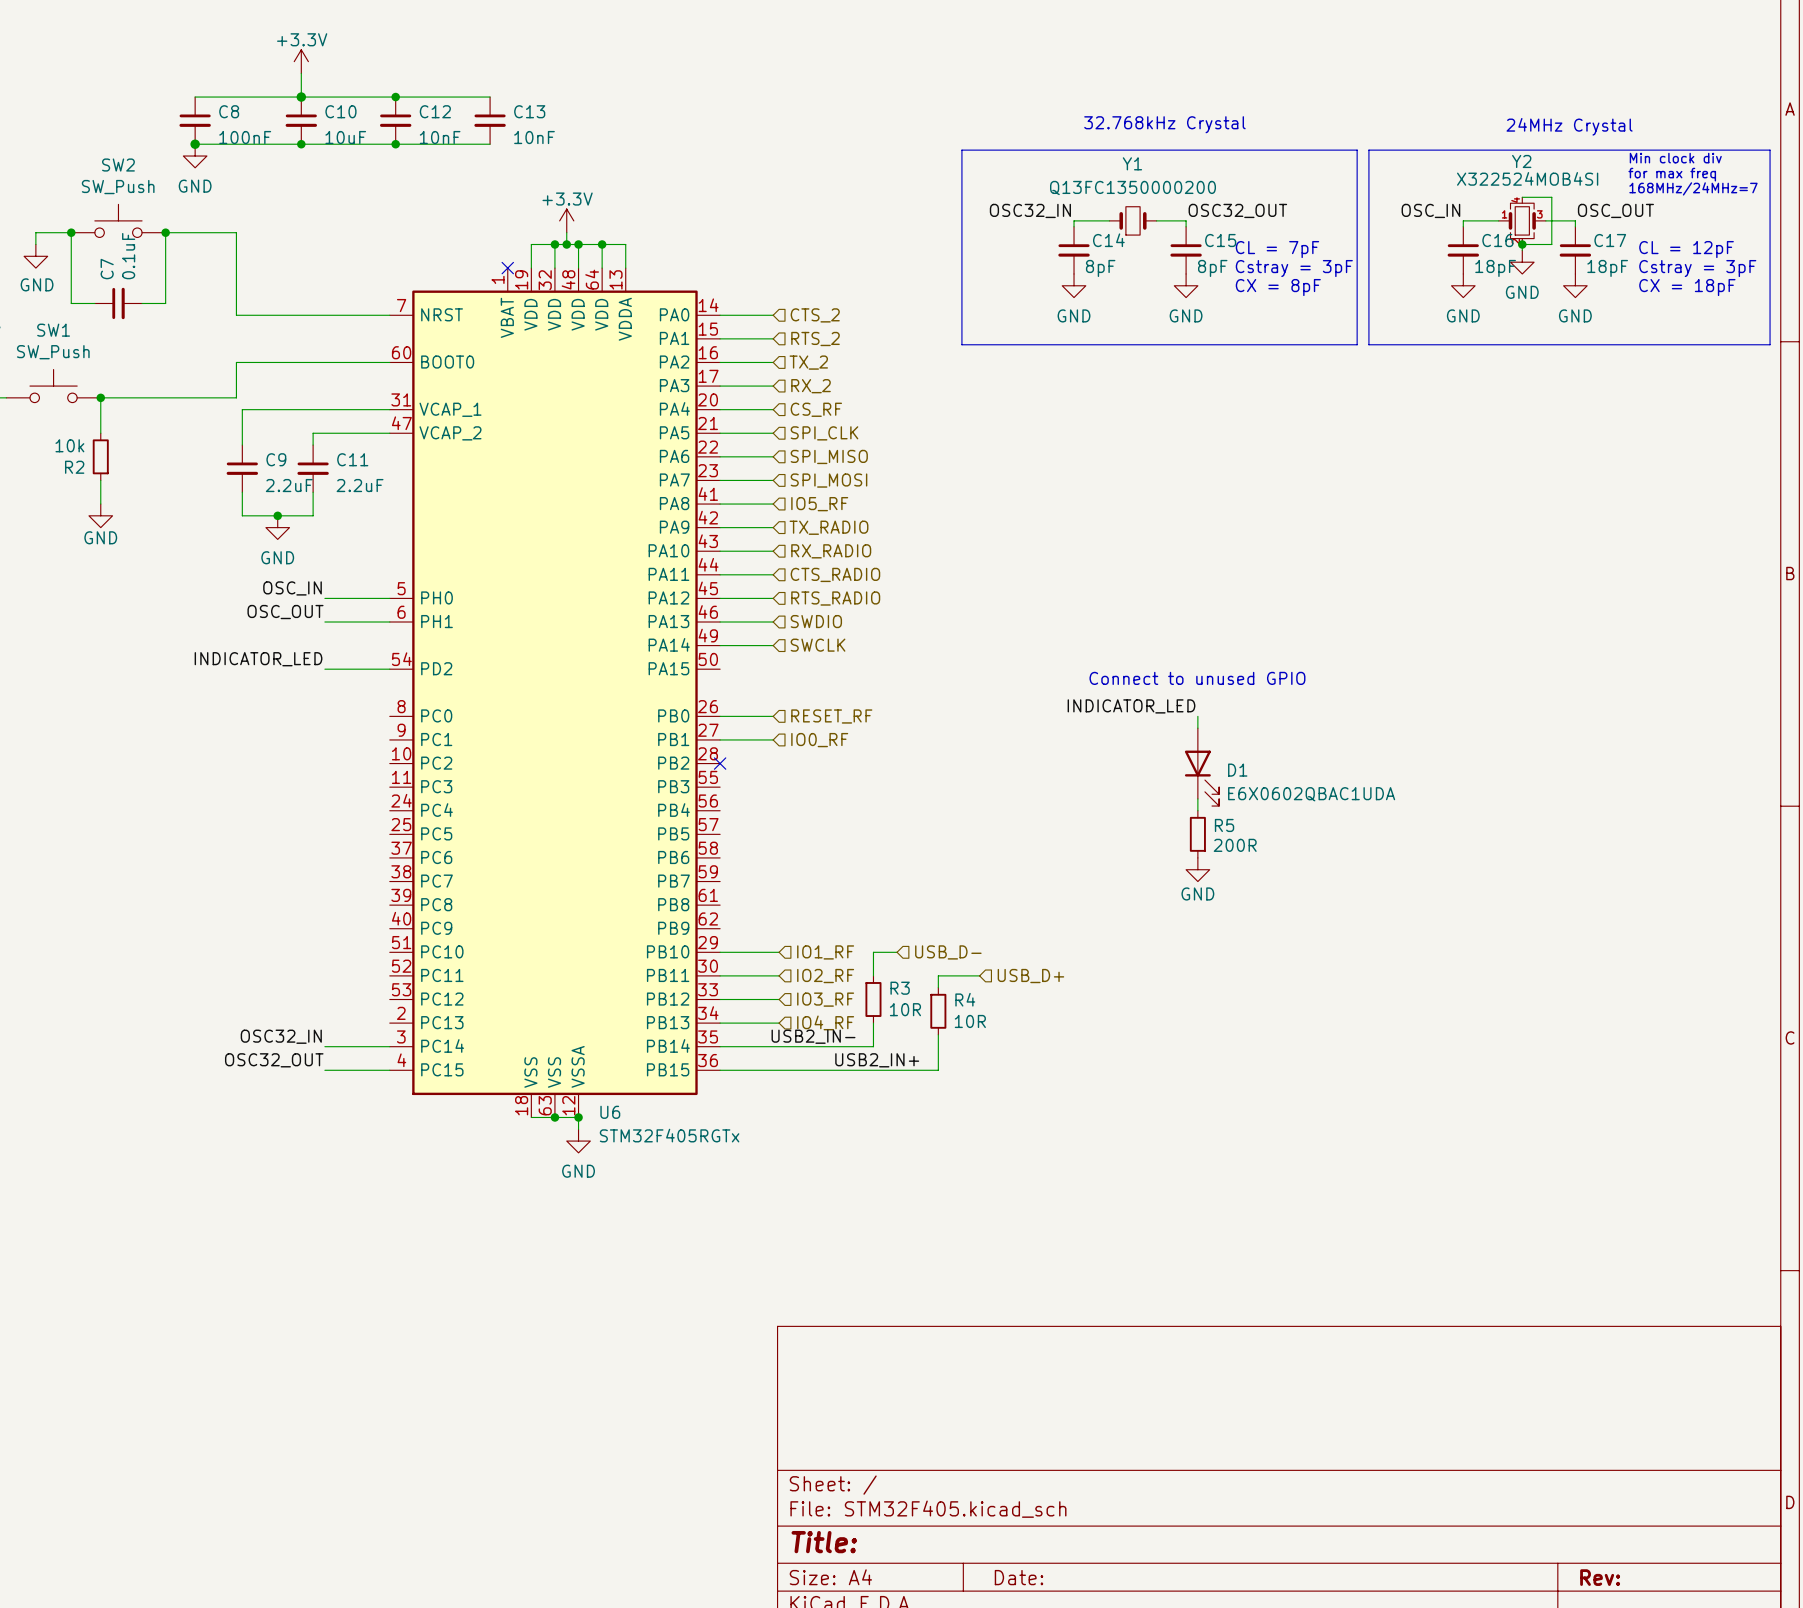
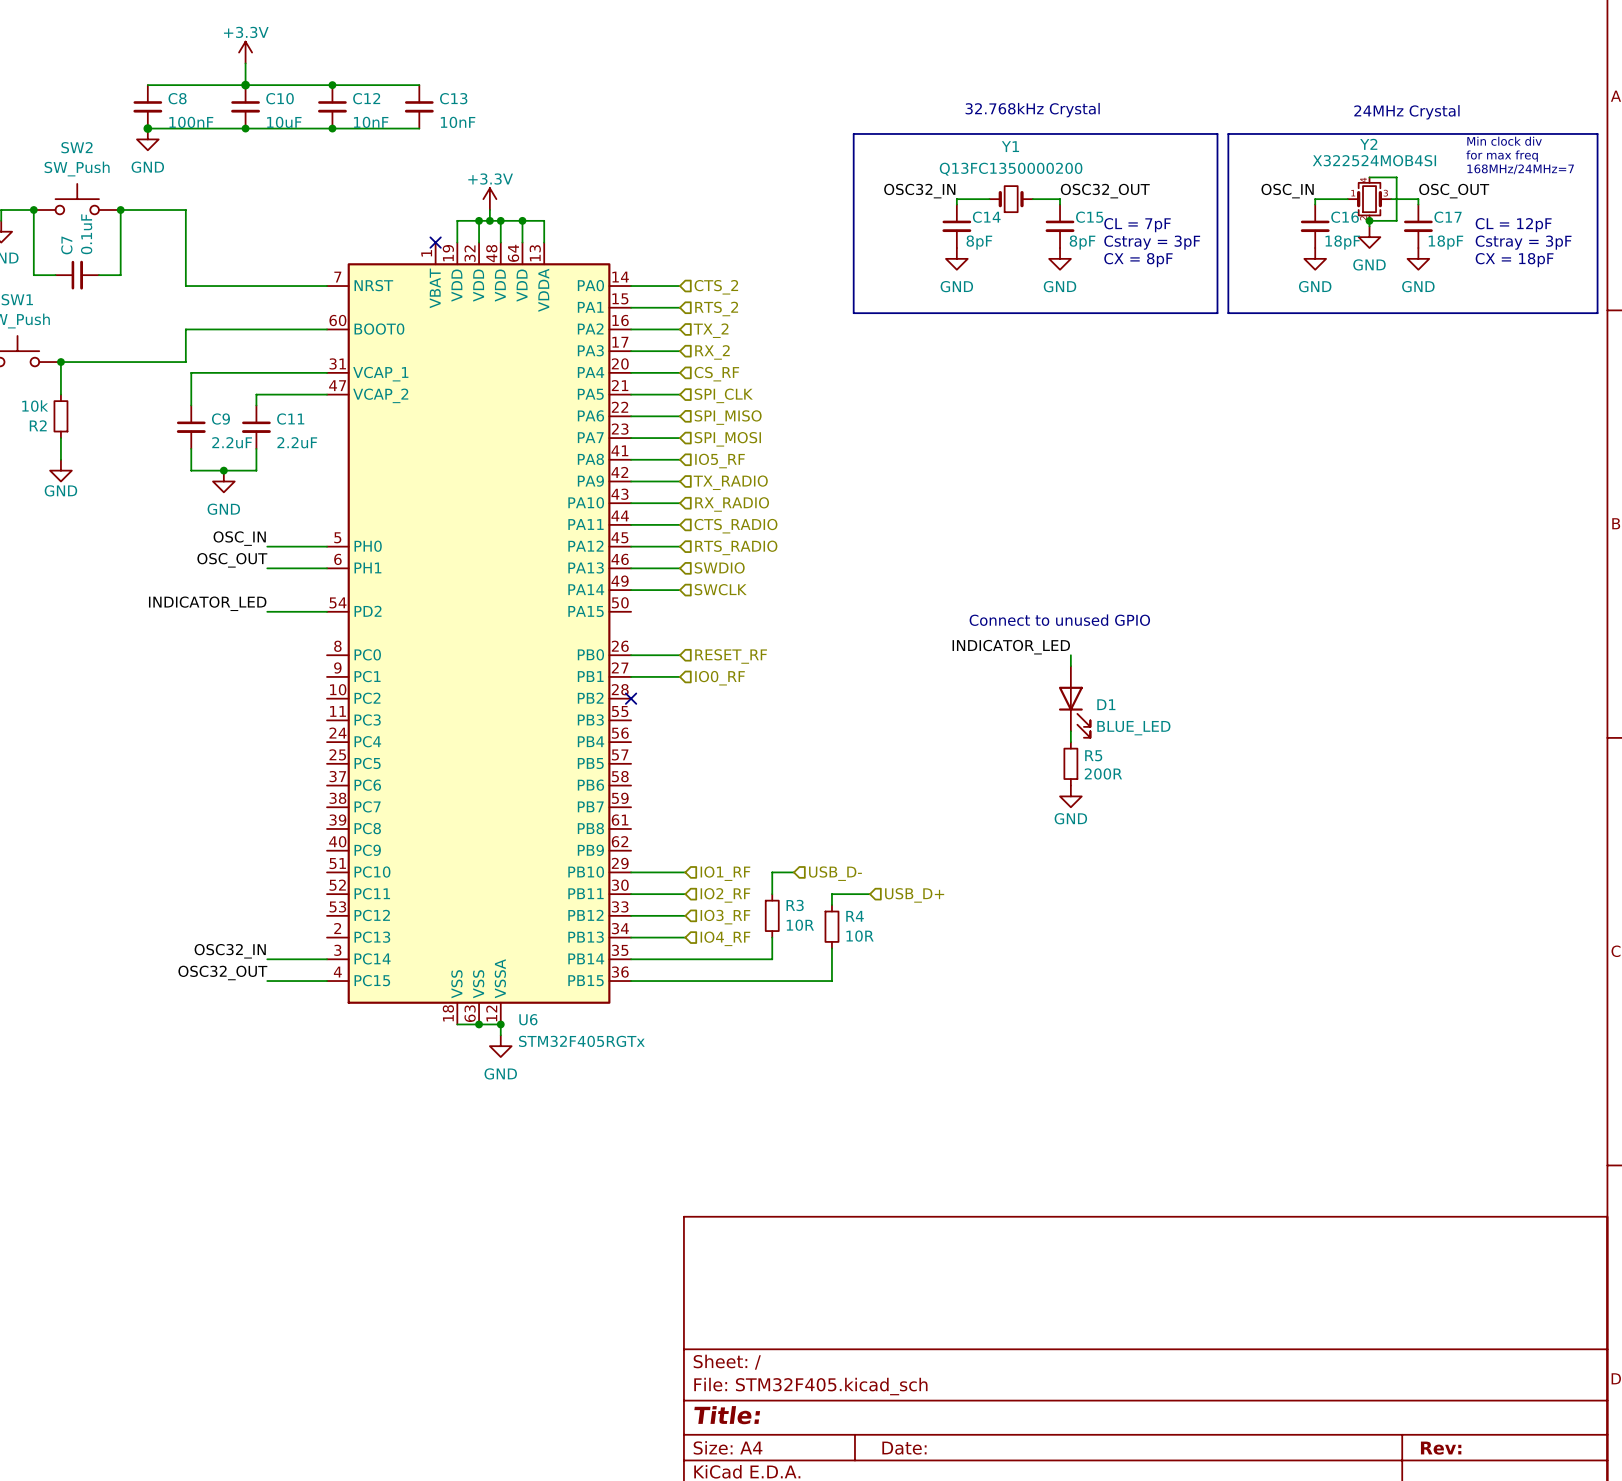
D1 value: E6X0602QBAC1UDA (1311, 794) -> BLUE_LED (1133, 728)
label: USB2_IN- (813, 1036) -> none
label: USB2_IN+ (877, 1060) -> none

